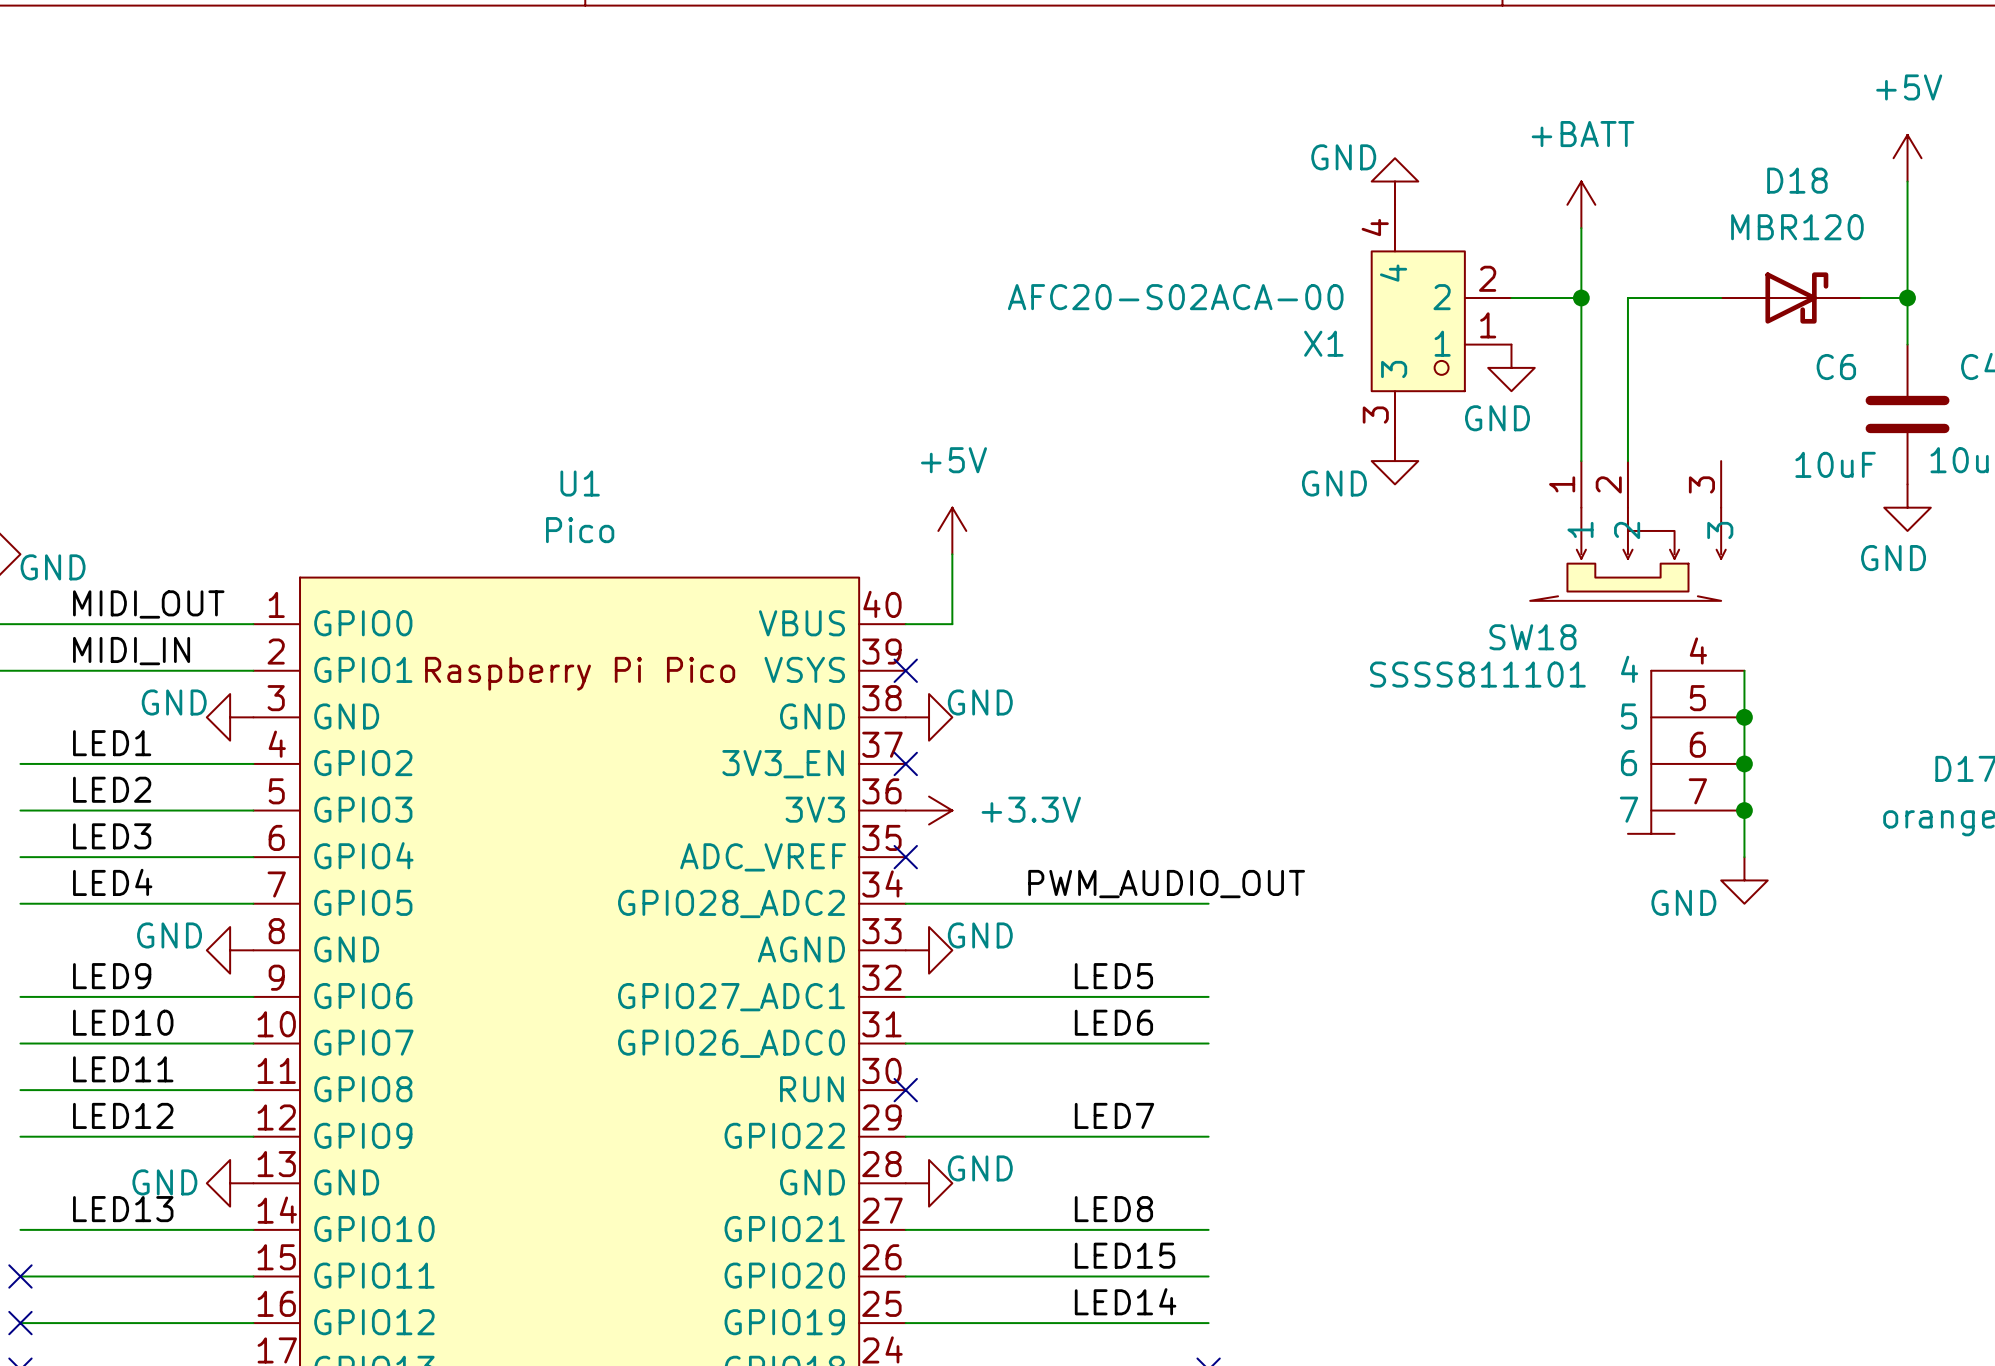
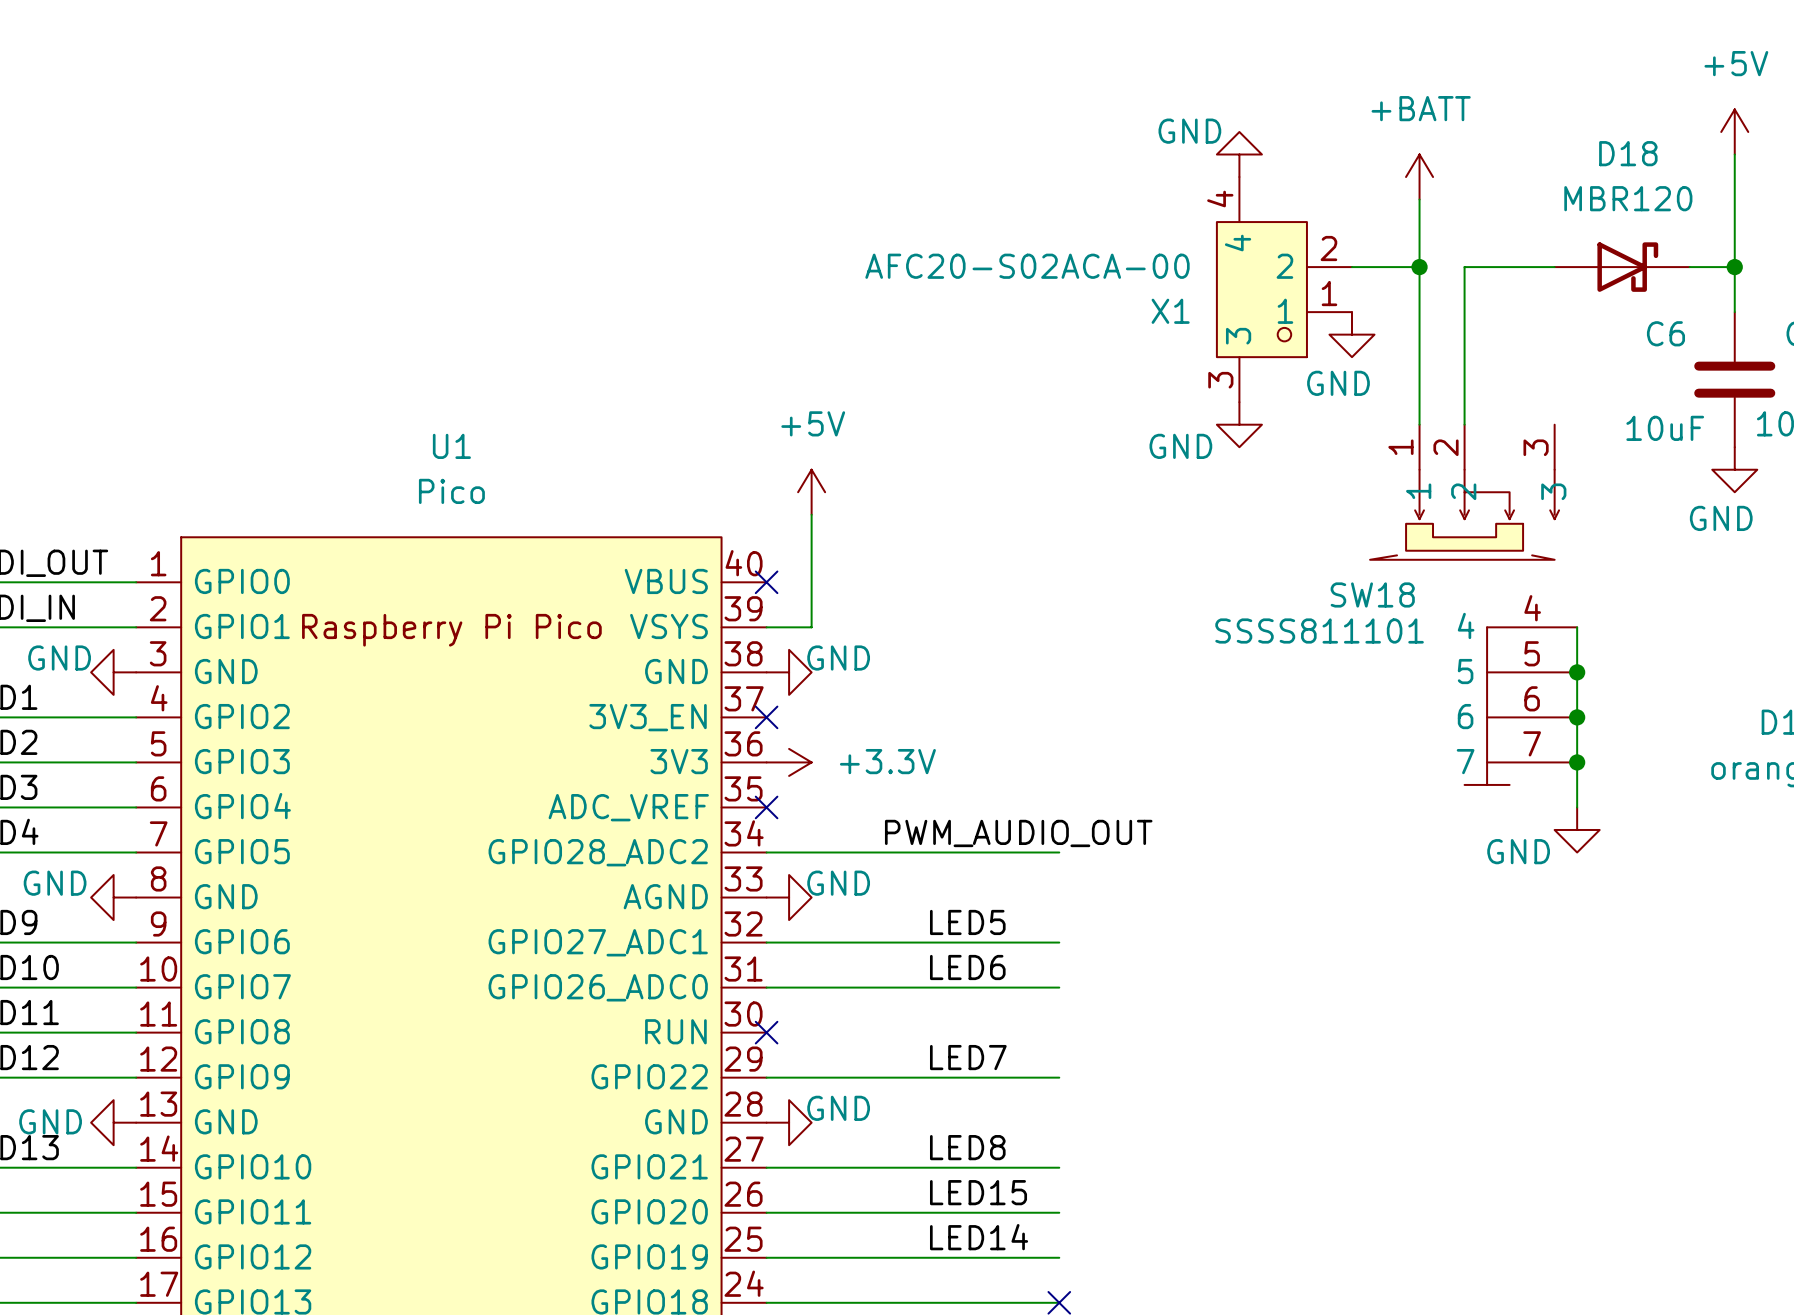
wire: (905, 624) (952, 624) -> (766, 627) (811, 627) (811, 582)
no-connect mark position: (905, 670) -> (766, 582)

